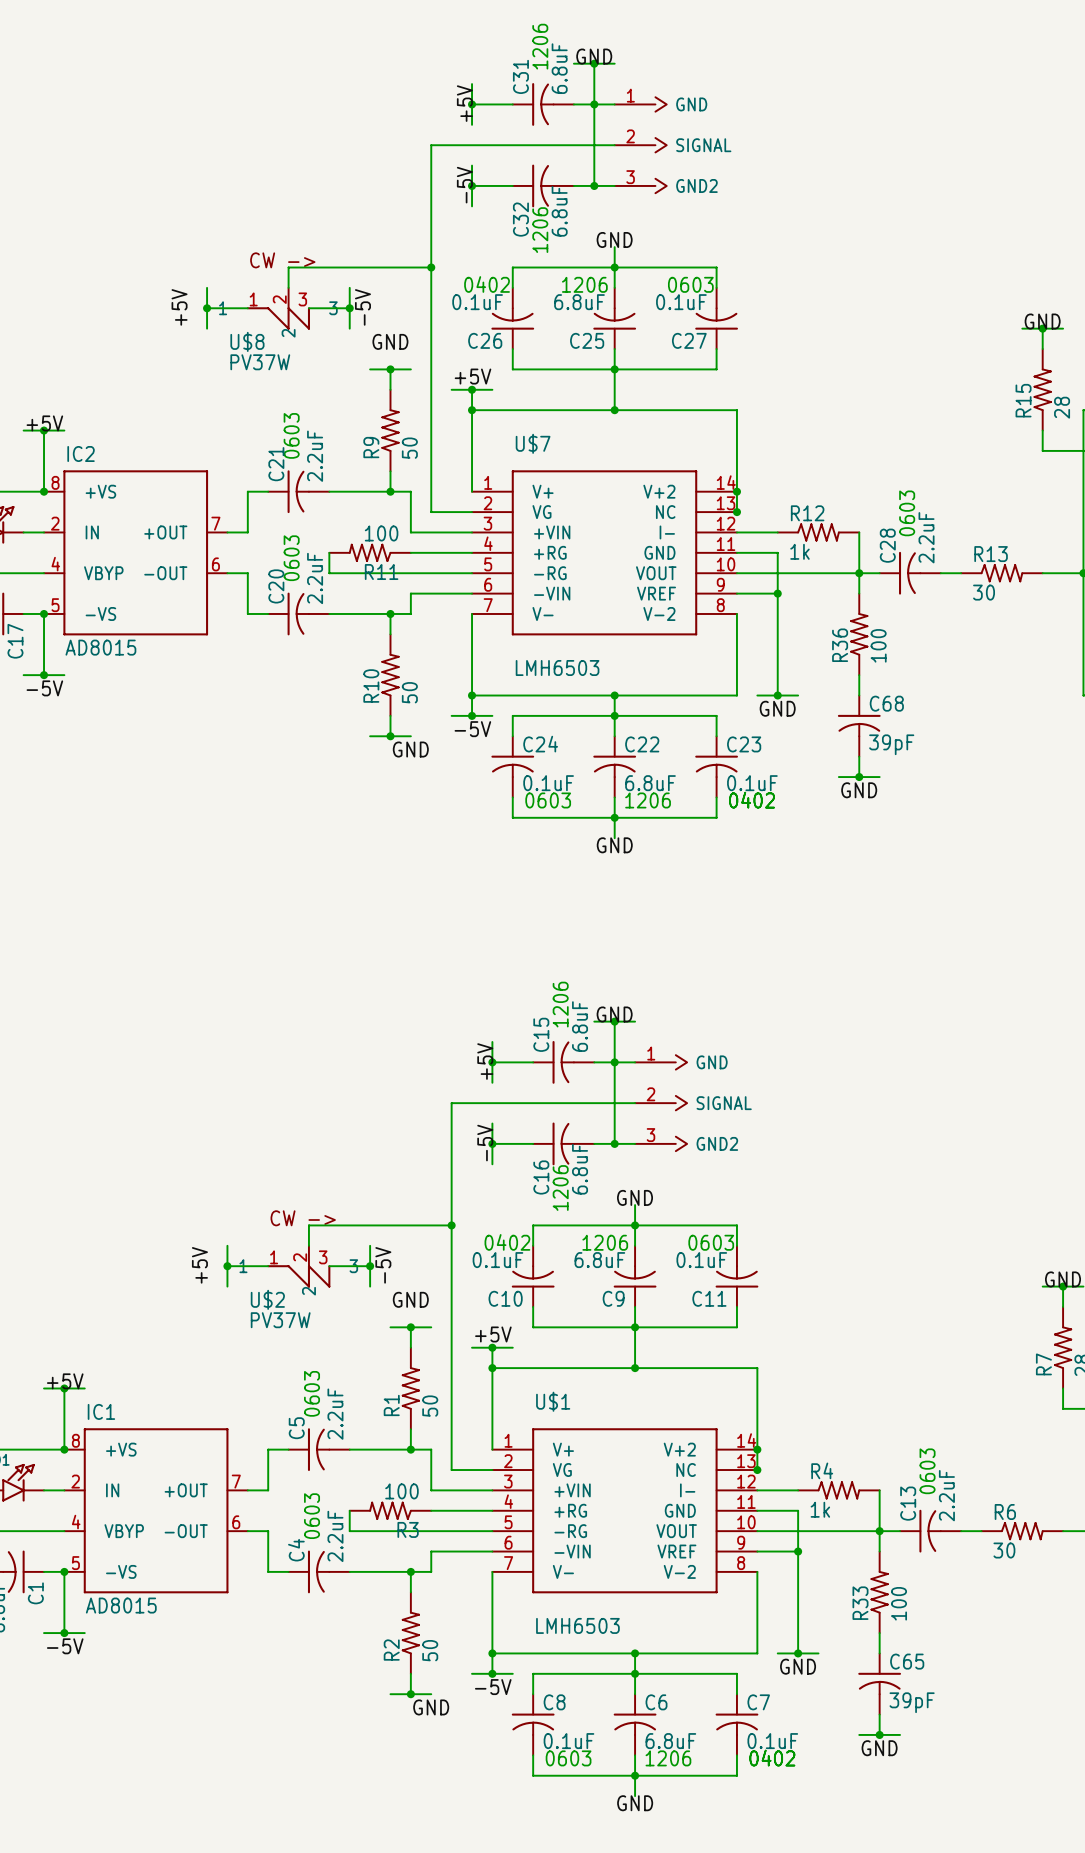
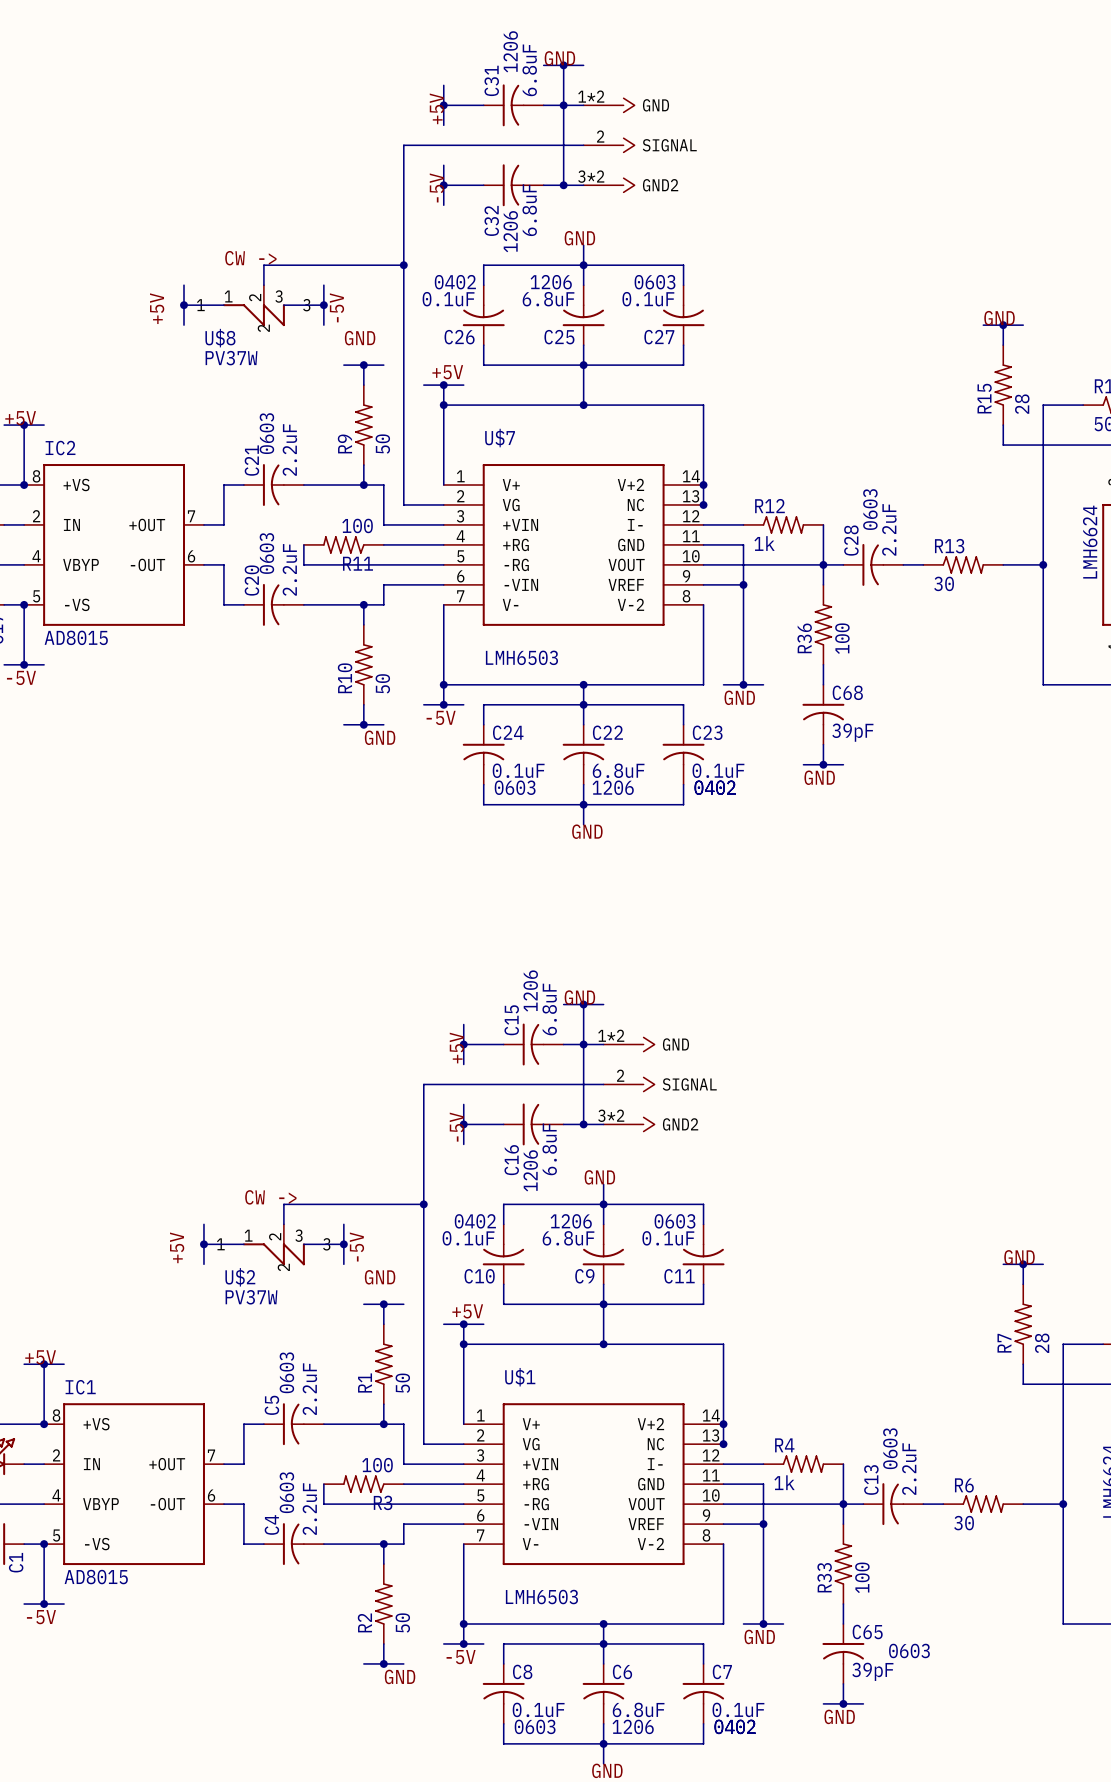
part pin number: 1 (630, 95) -> 1*2 (591, 96)
part pin number: 3 (630, 177) -> 3*2 (591, 176)
part pin number: 1 (651, 1053) -> 1*2 (611, 1035)
part pin number: 3 (650, 1135) -> 3*2 (611, 1115)
text: none -> 0603 (909, 1650)

